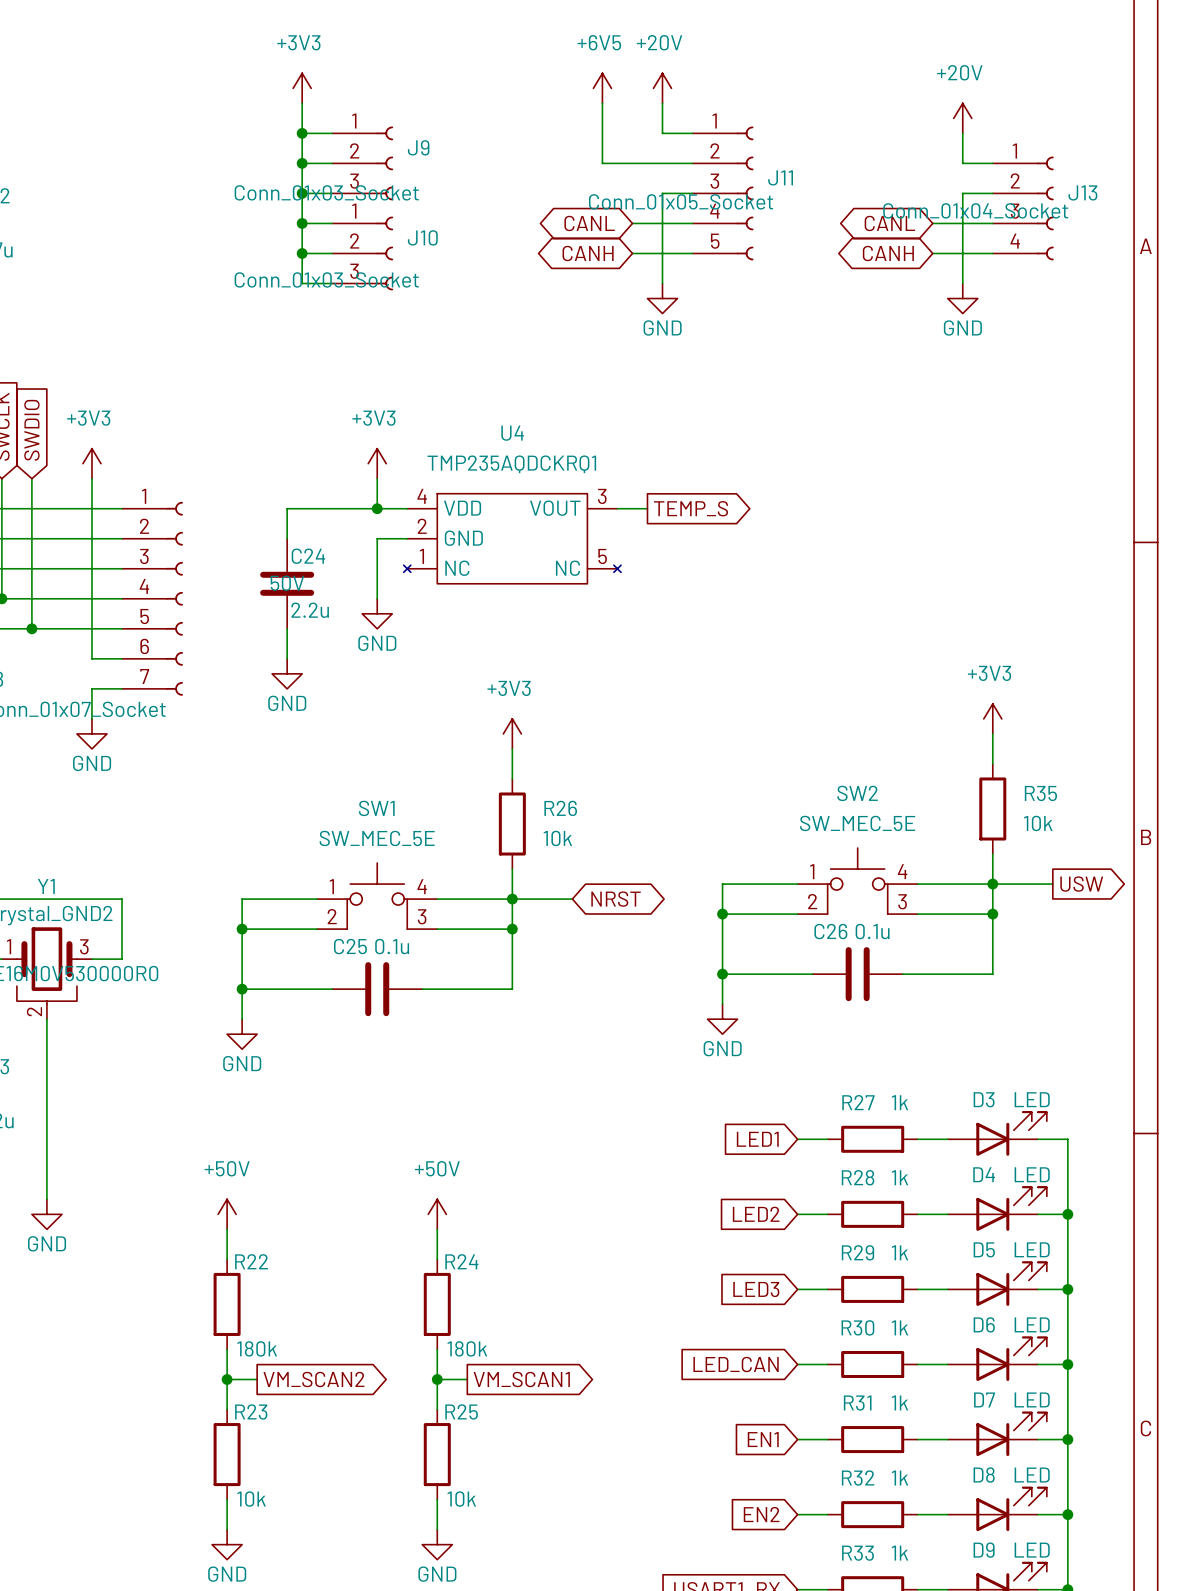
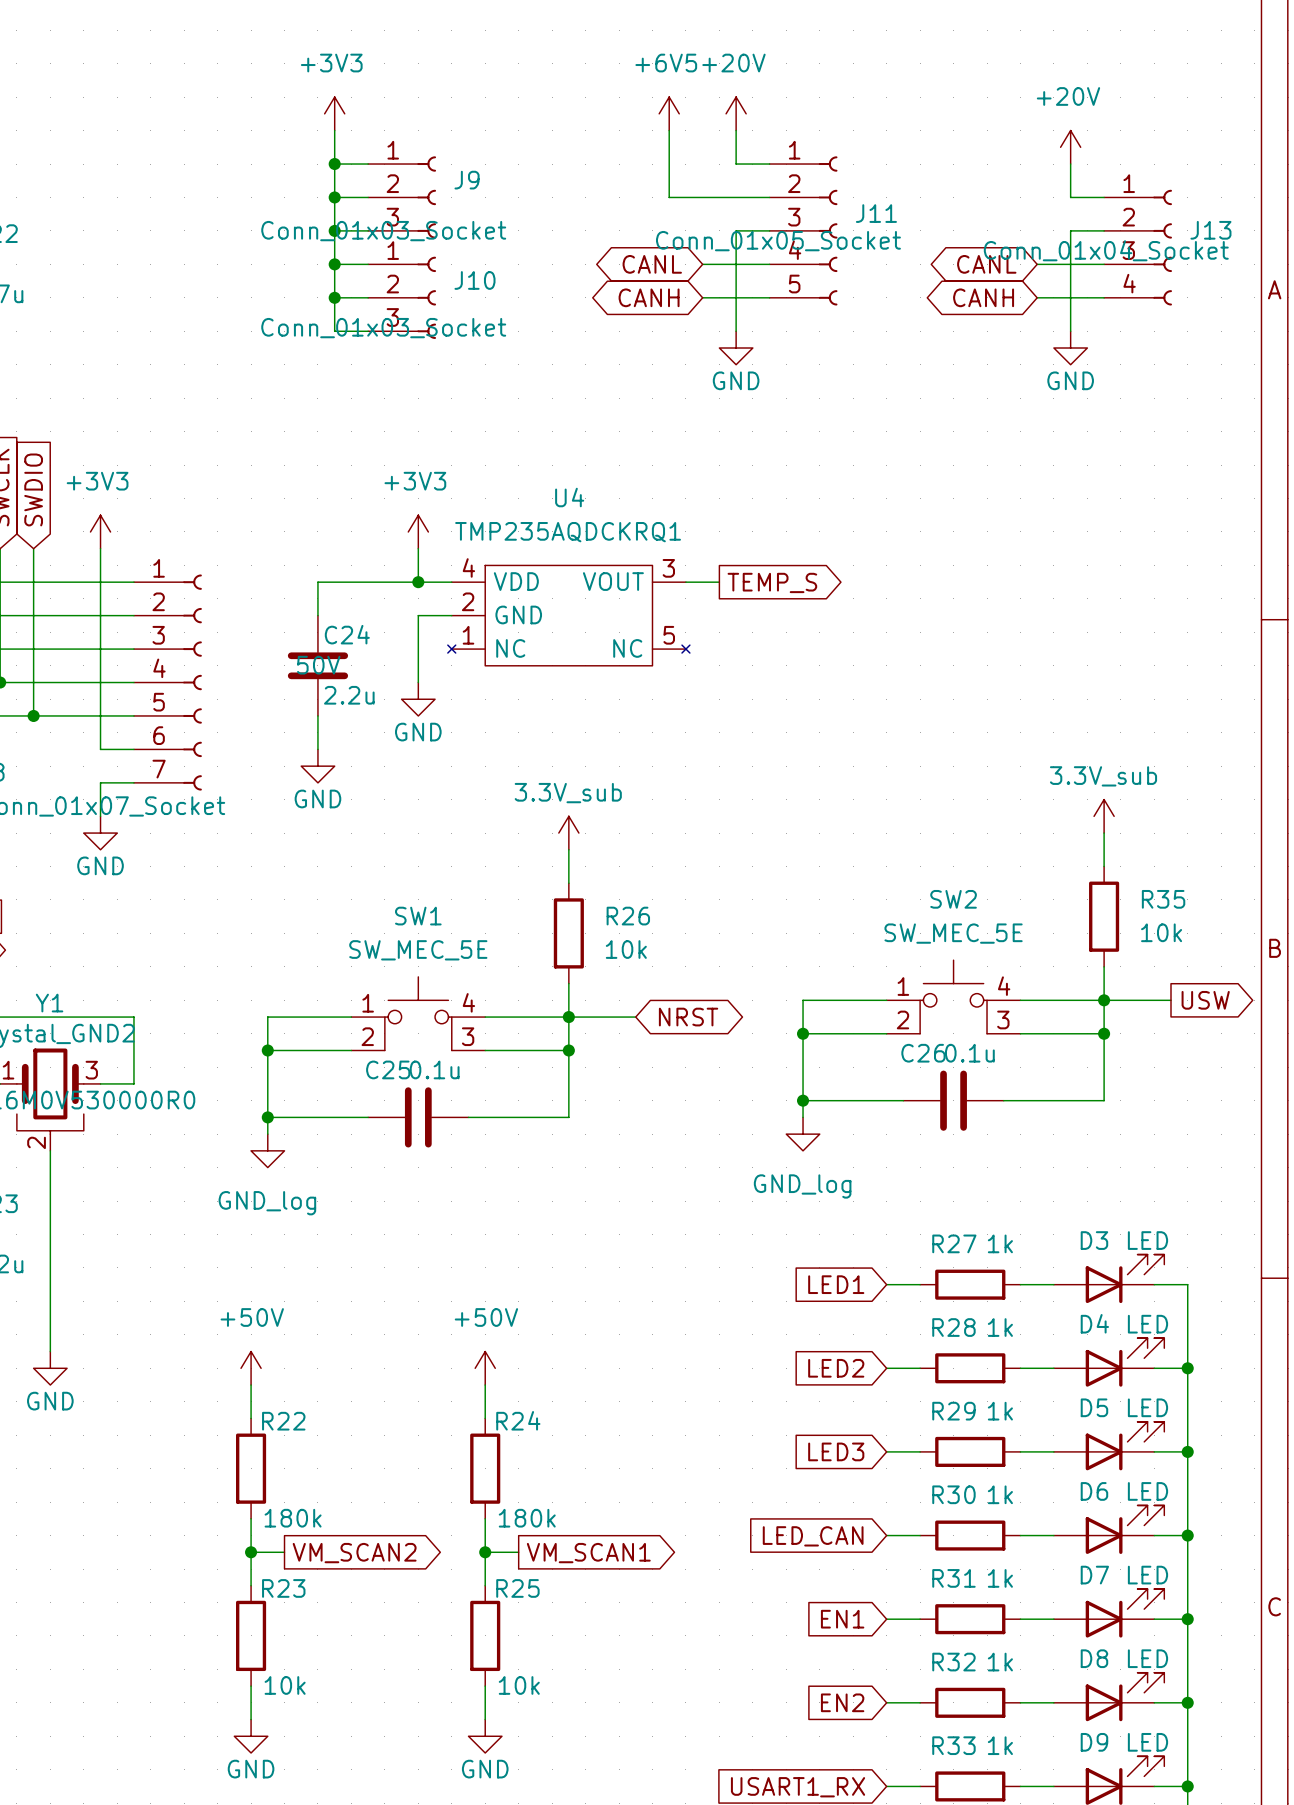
power symbol: +3V3 (992, 718) -> 3.3V_sub (1104, 816)
power symbol: +3V3 (512, 733) -> 3.3V_sub (568, 833)
power symbol: none -> GND_log (803, 1134)
power symbol: none -> GND_log (267, 1150)
power symbol: GND (722, 1019) -> none
power symbol: GND (242, 1034) -> none

